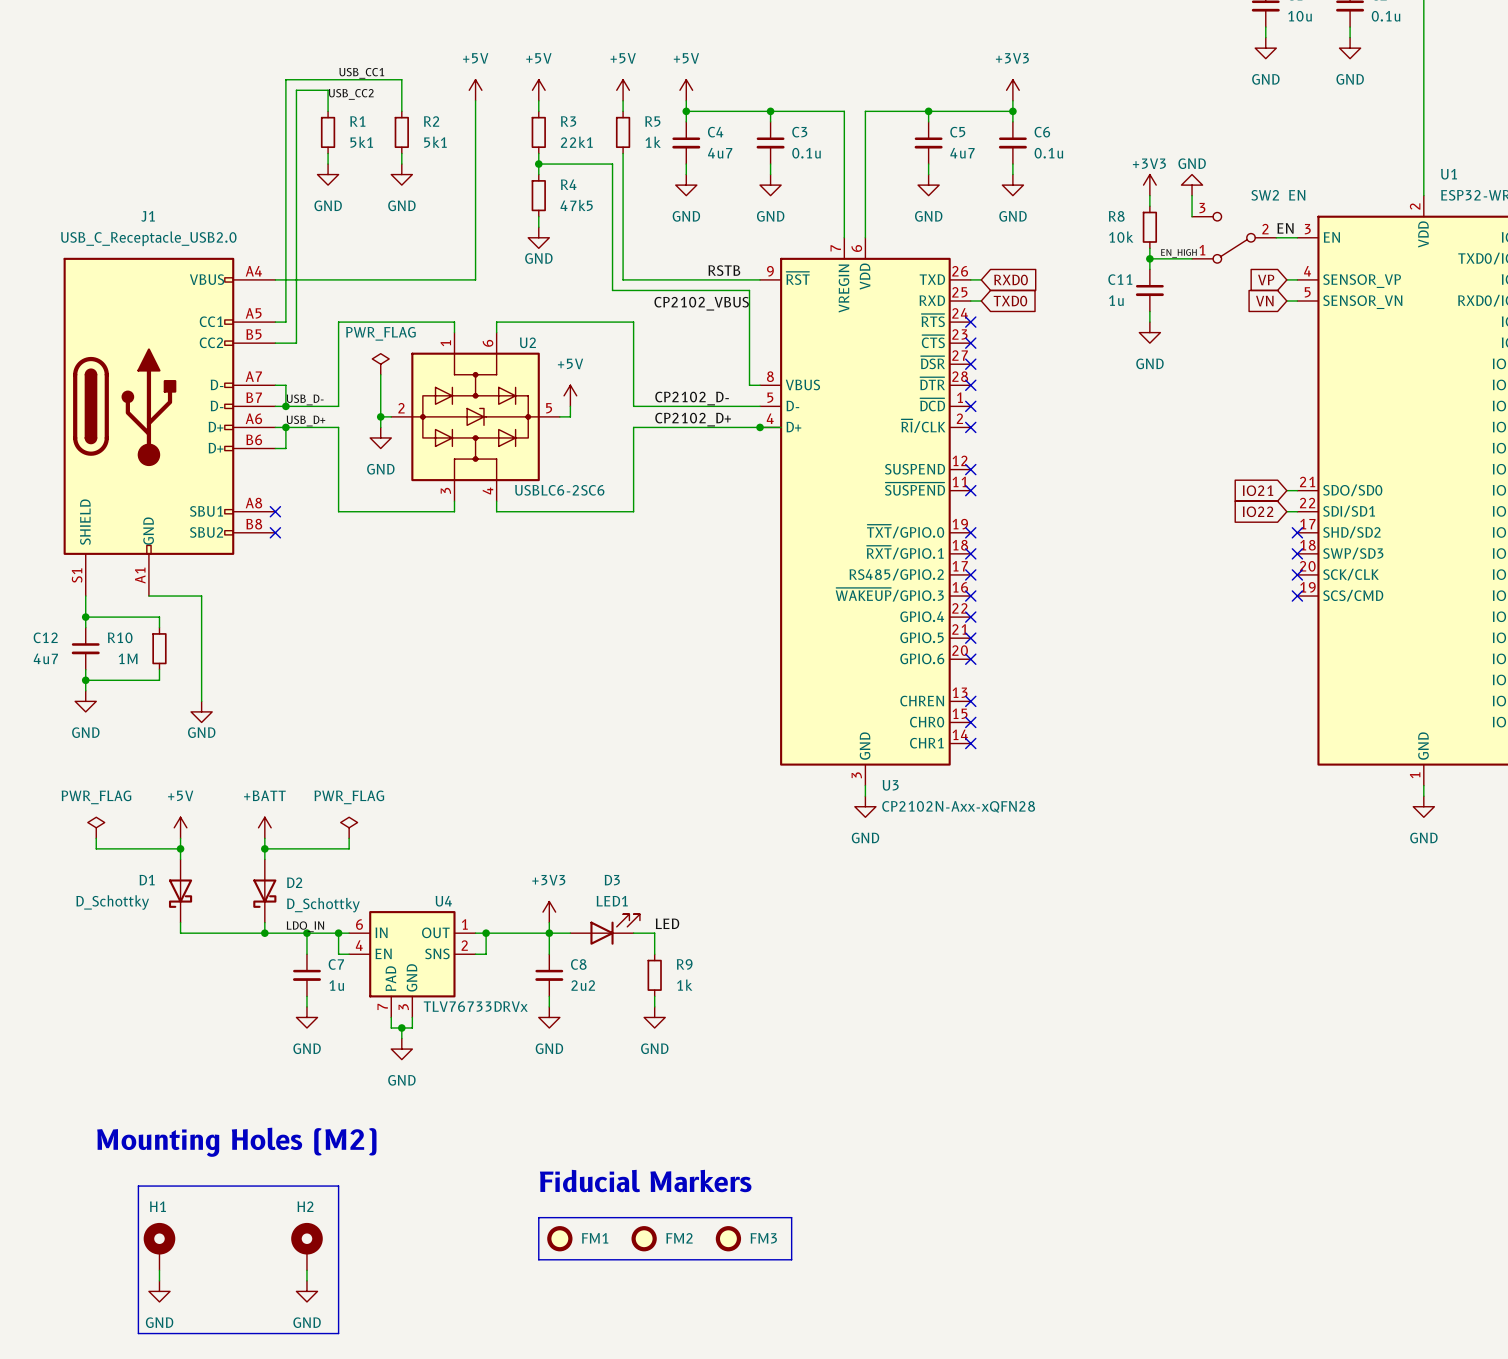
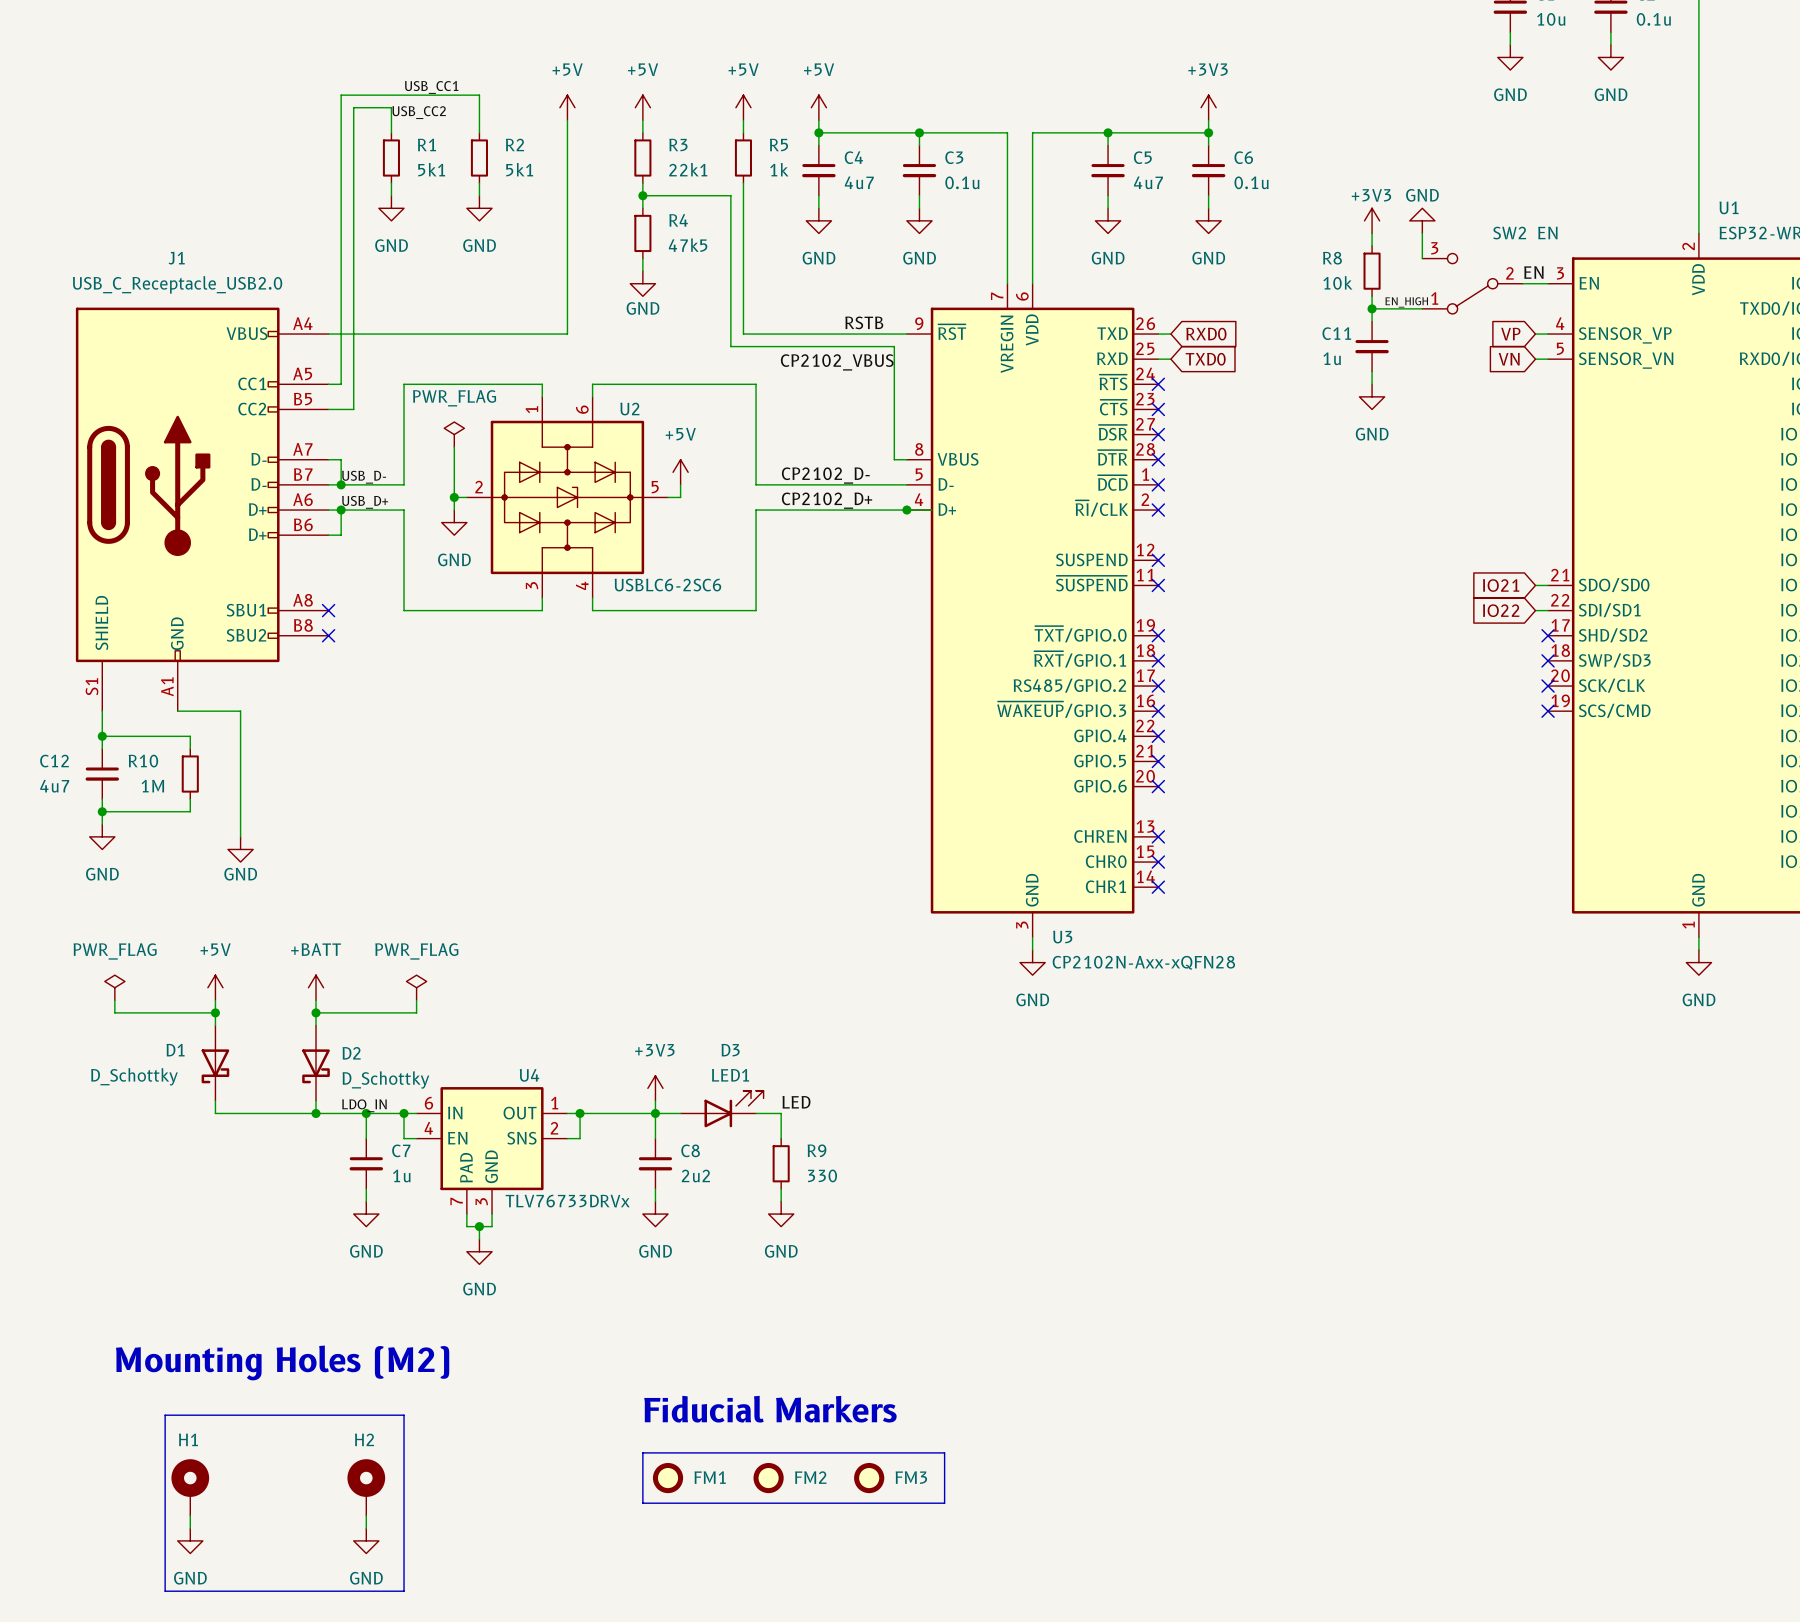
R9 value: 1k (684, 985) -> 330 (822, 1175)

